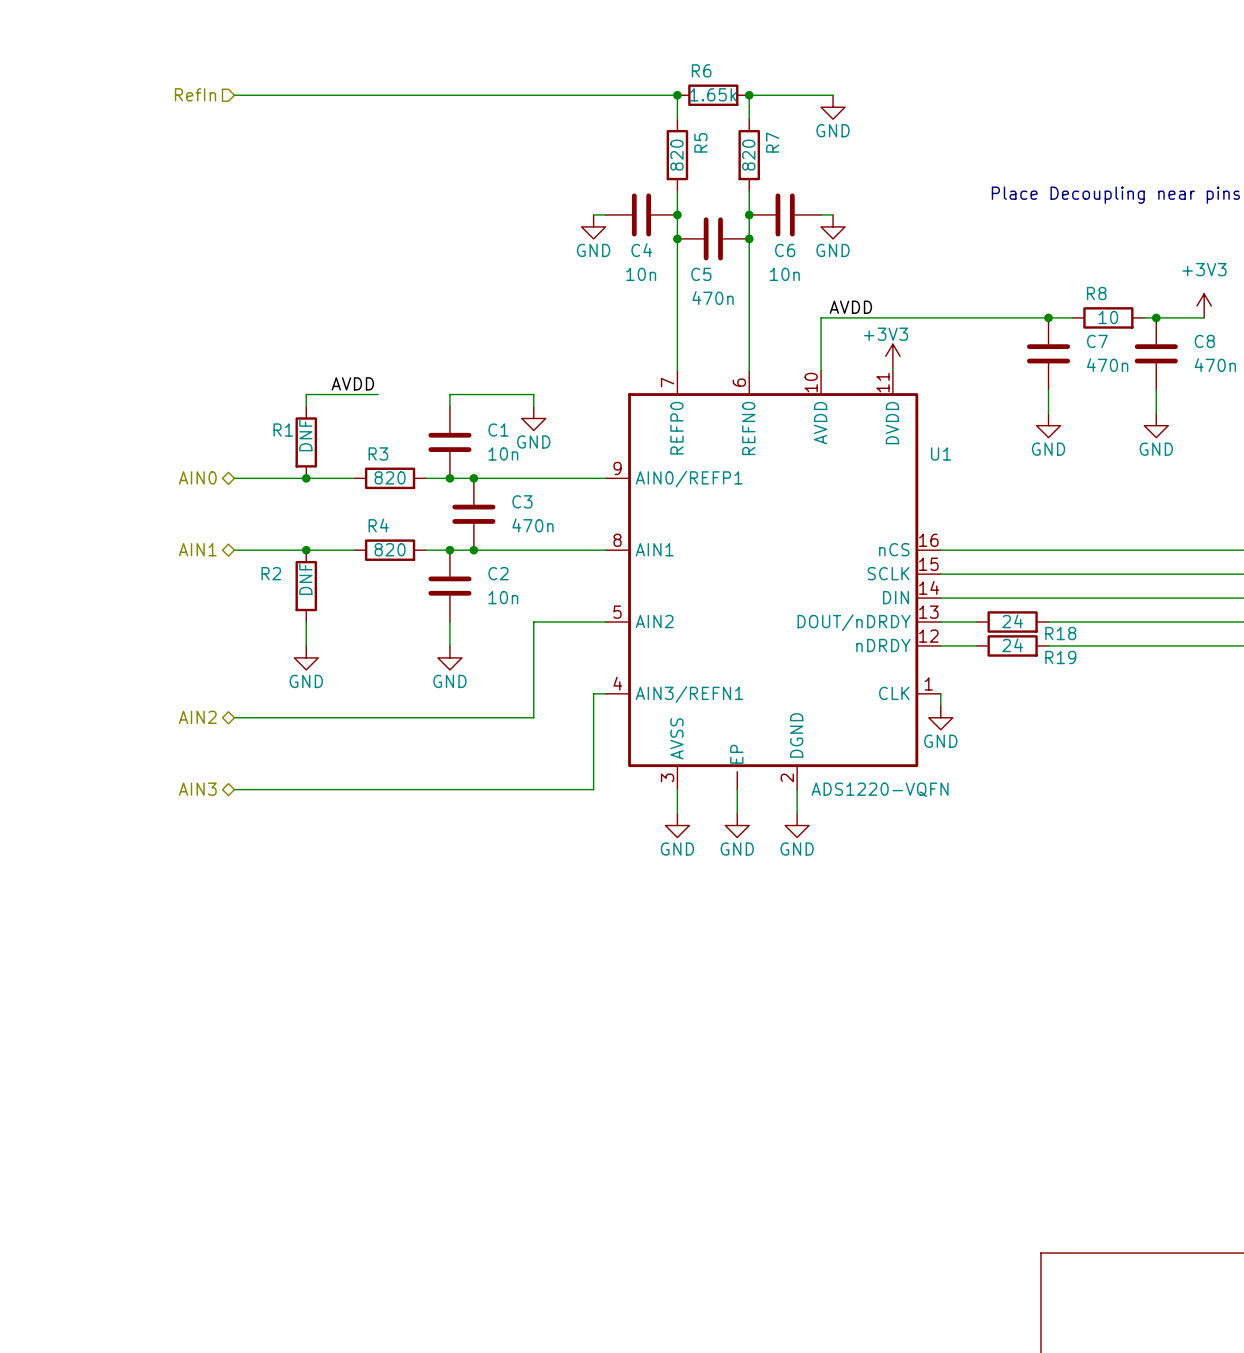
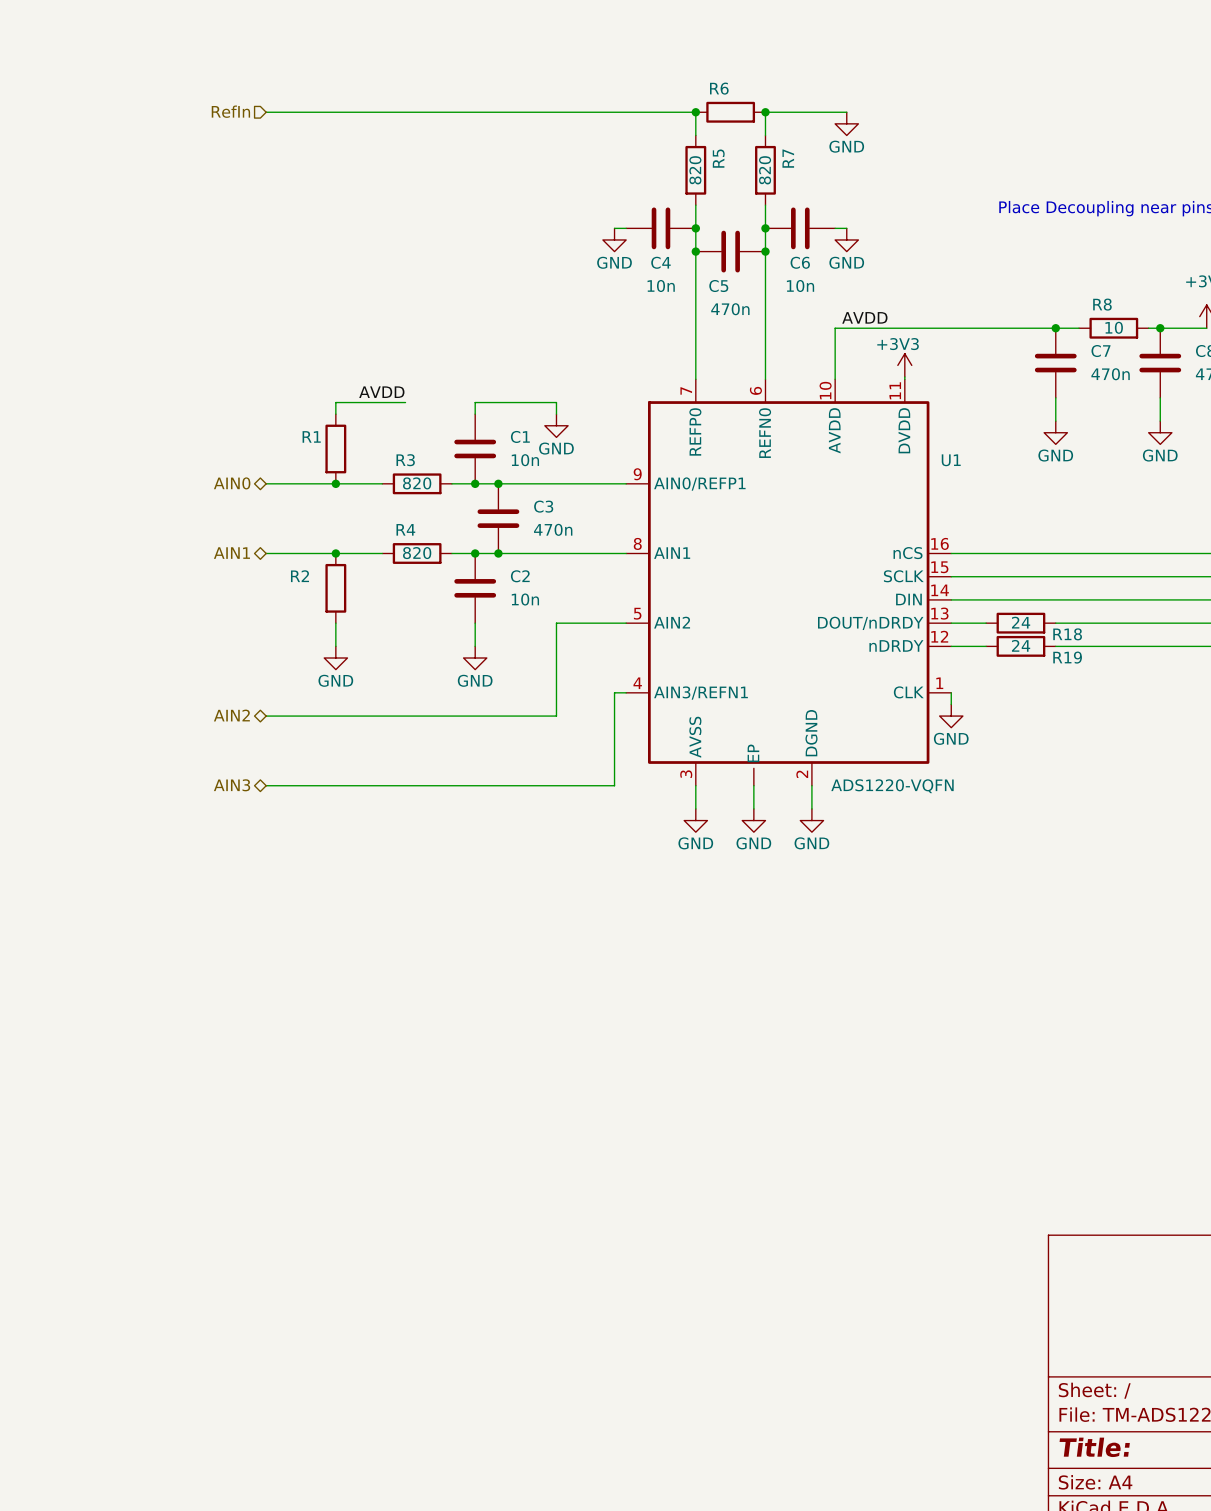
R6 value: 1.65k (713, 94) -> none
R1 value: DNF (305, 435) -> none
R2 value: DNF (305, 579) -> none

